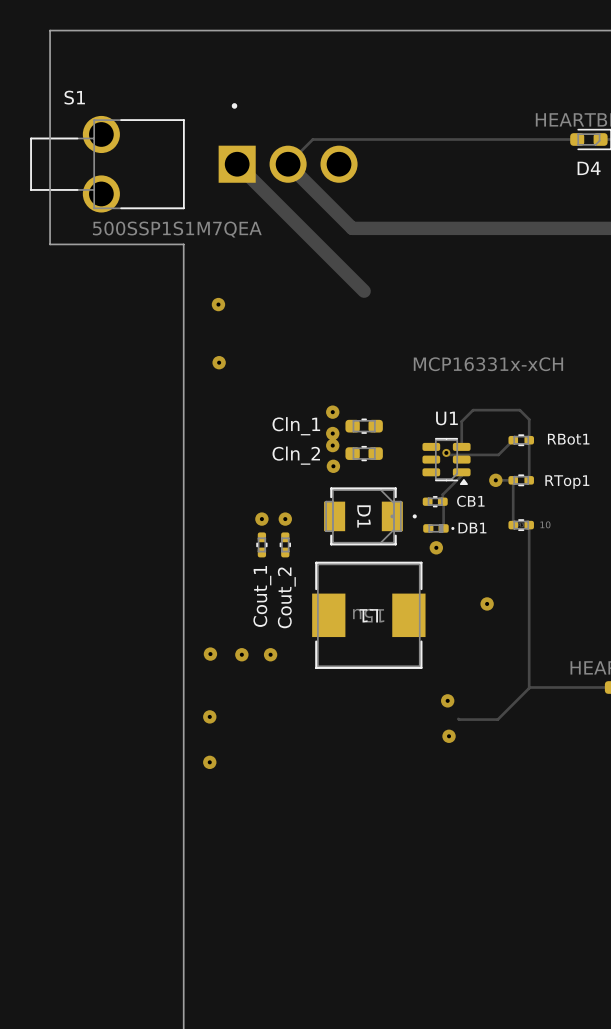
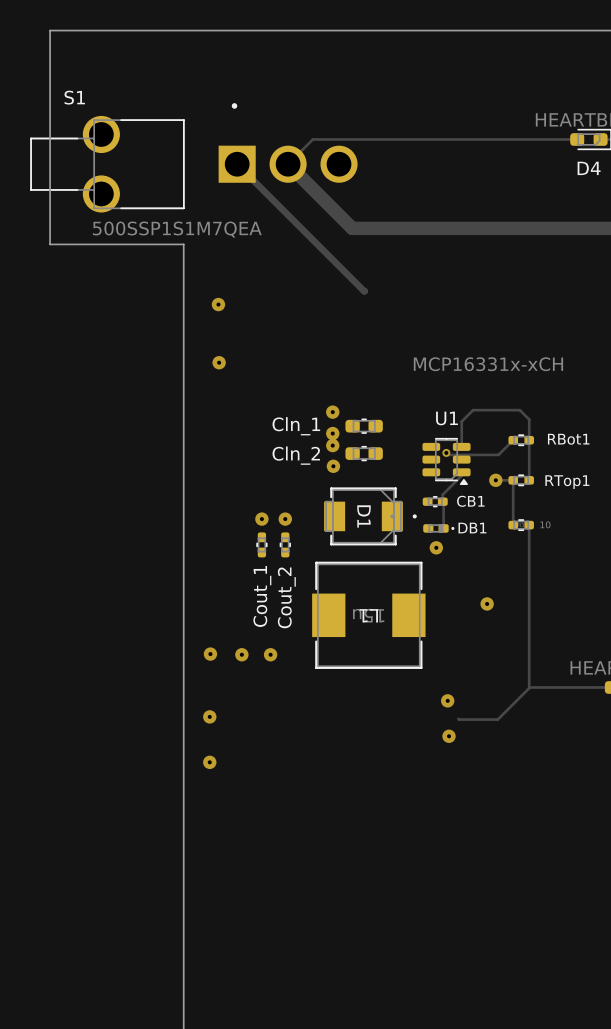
track width: thick (237, 164) (364, 291) -> thin (237, 164) (364, 291)

